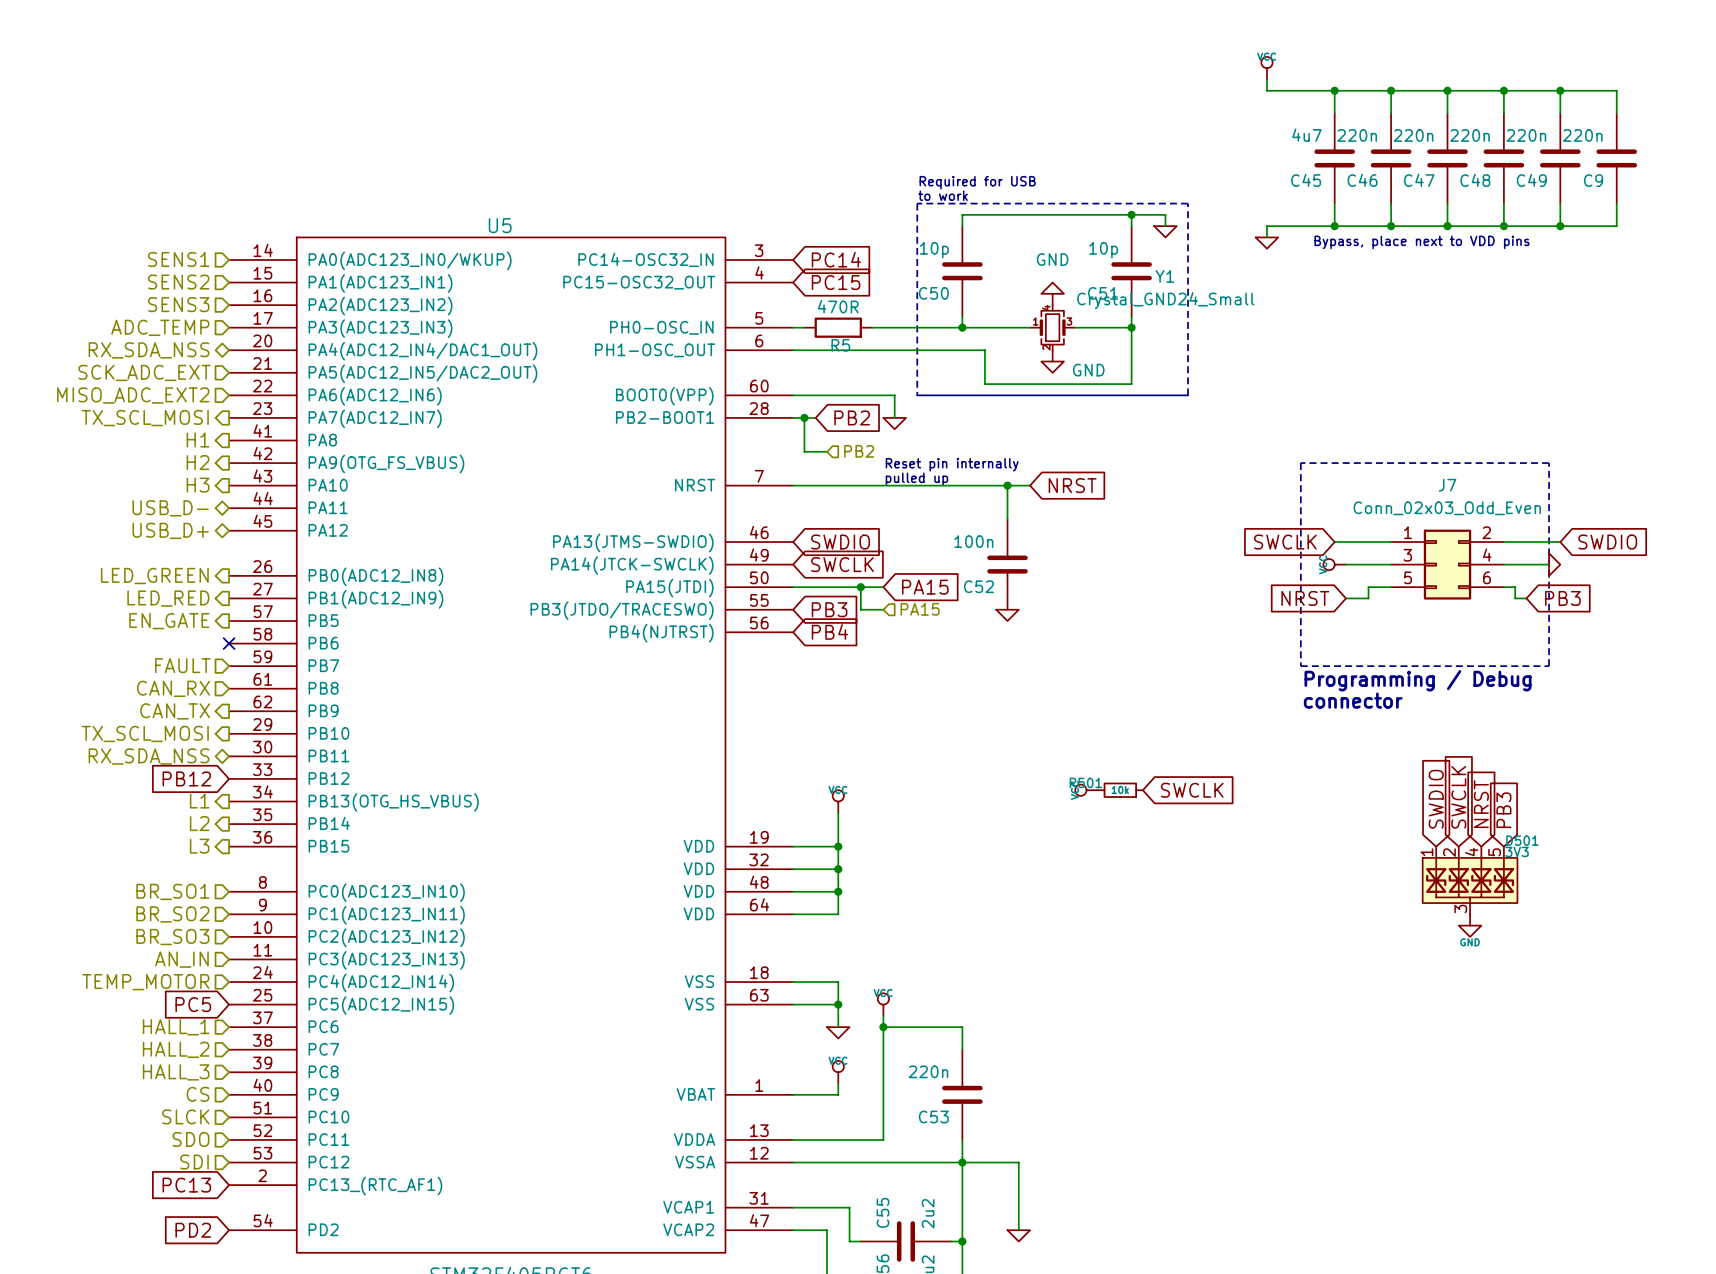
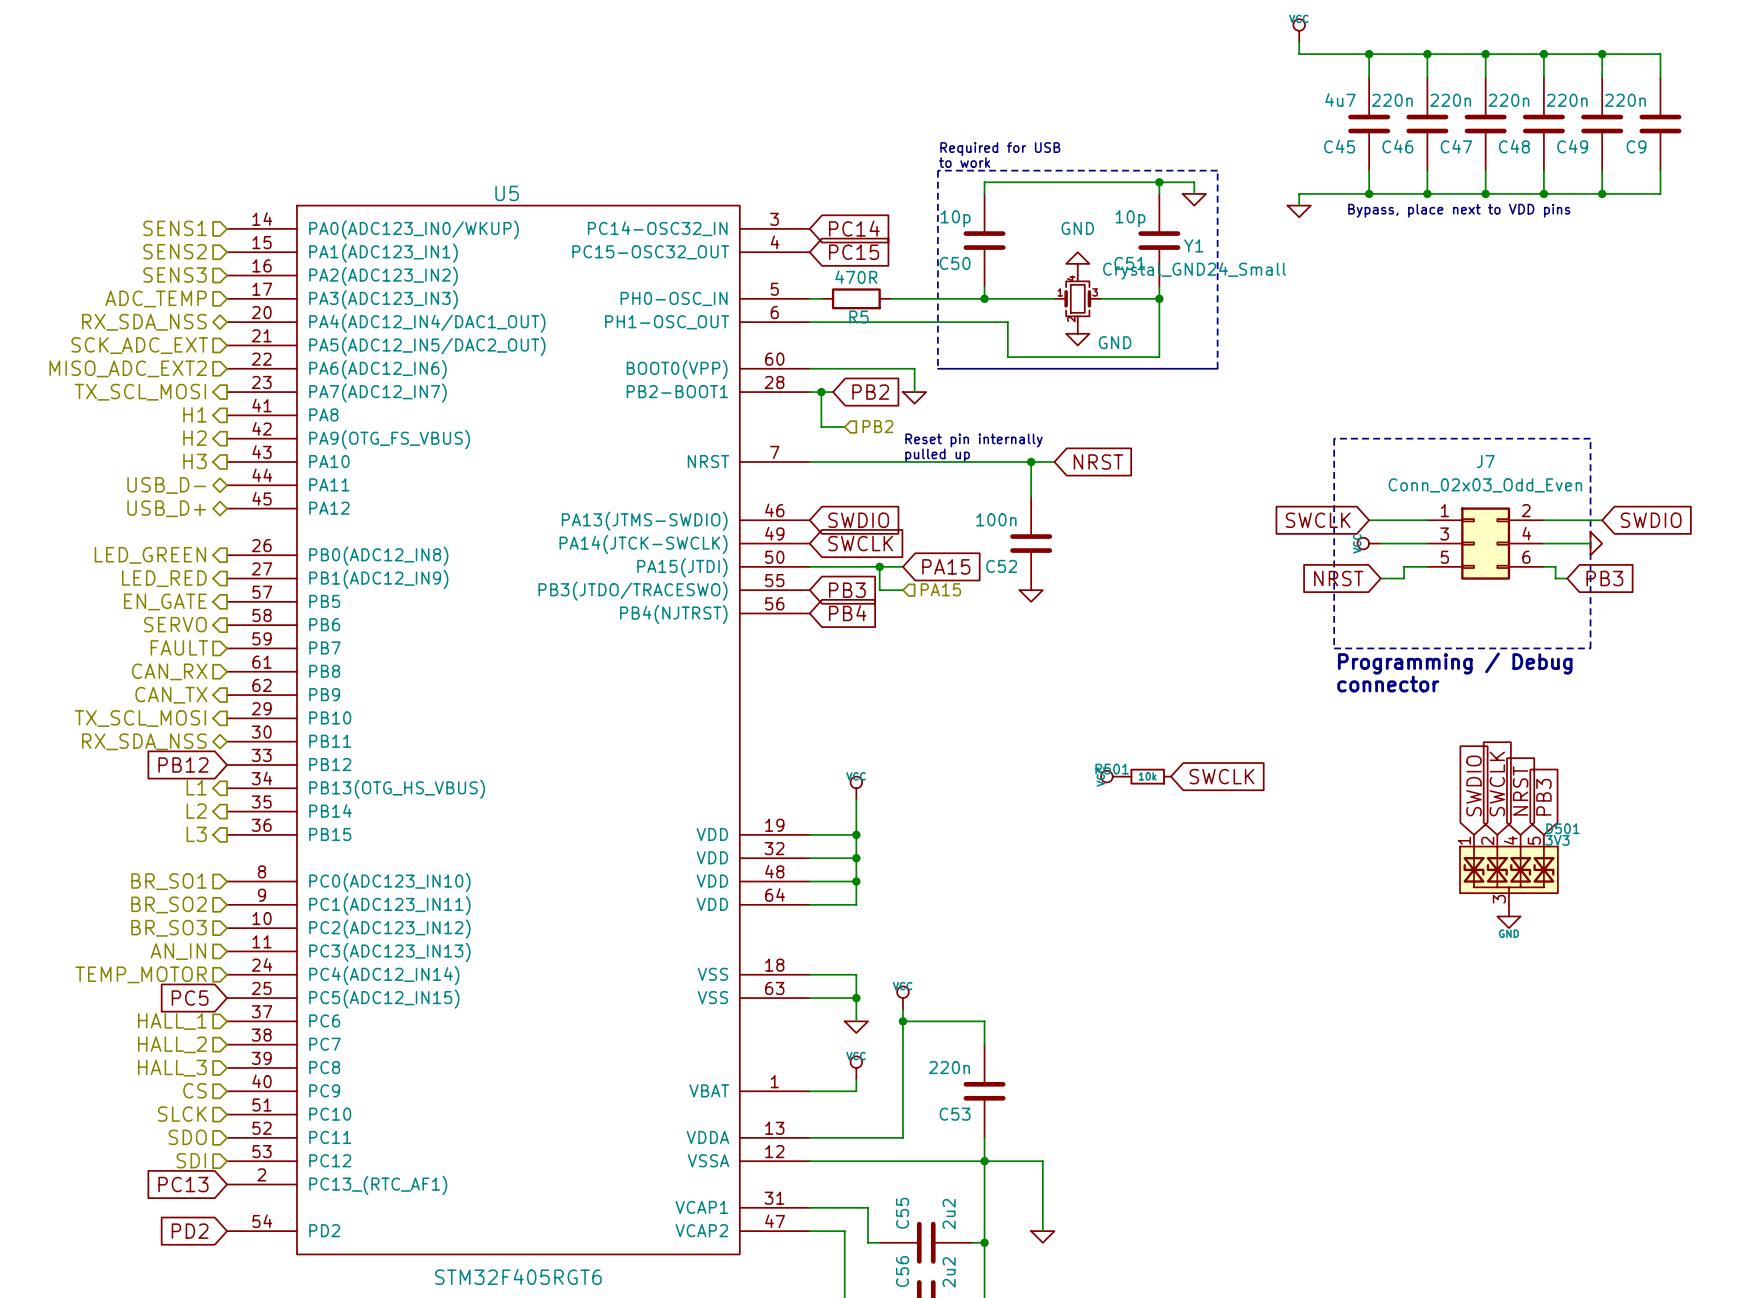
hierarchical label: none -> SERVO (175, 624)
no-connect mark: (229, 643) -> none

